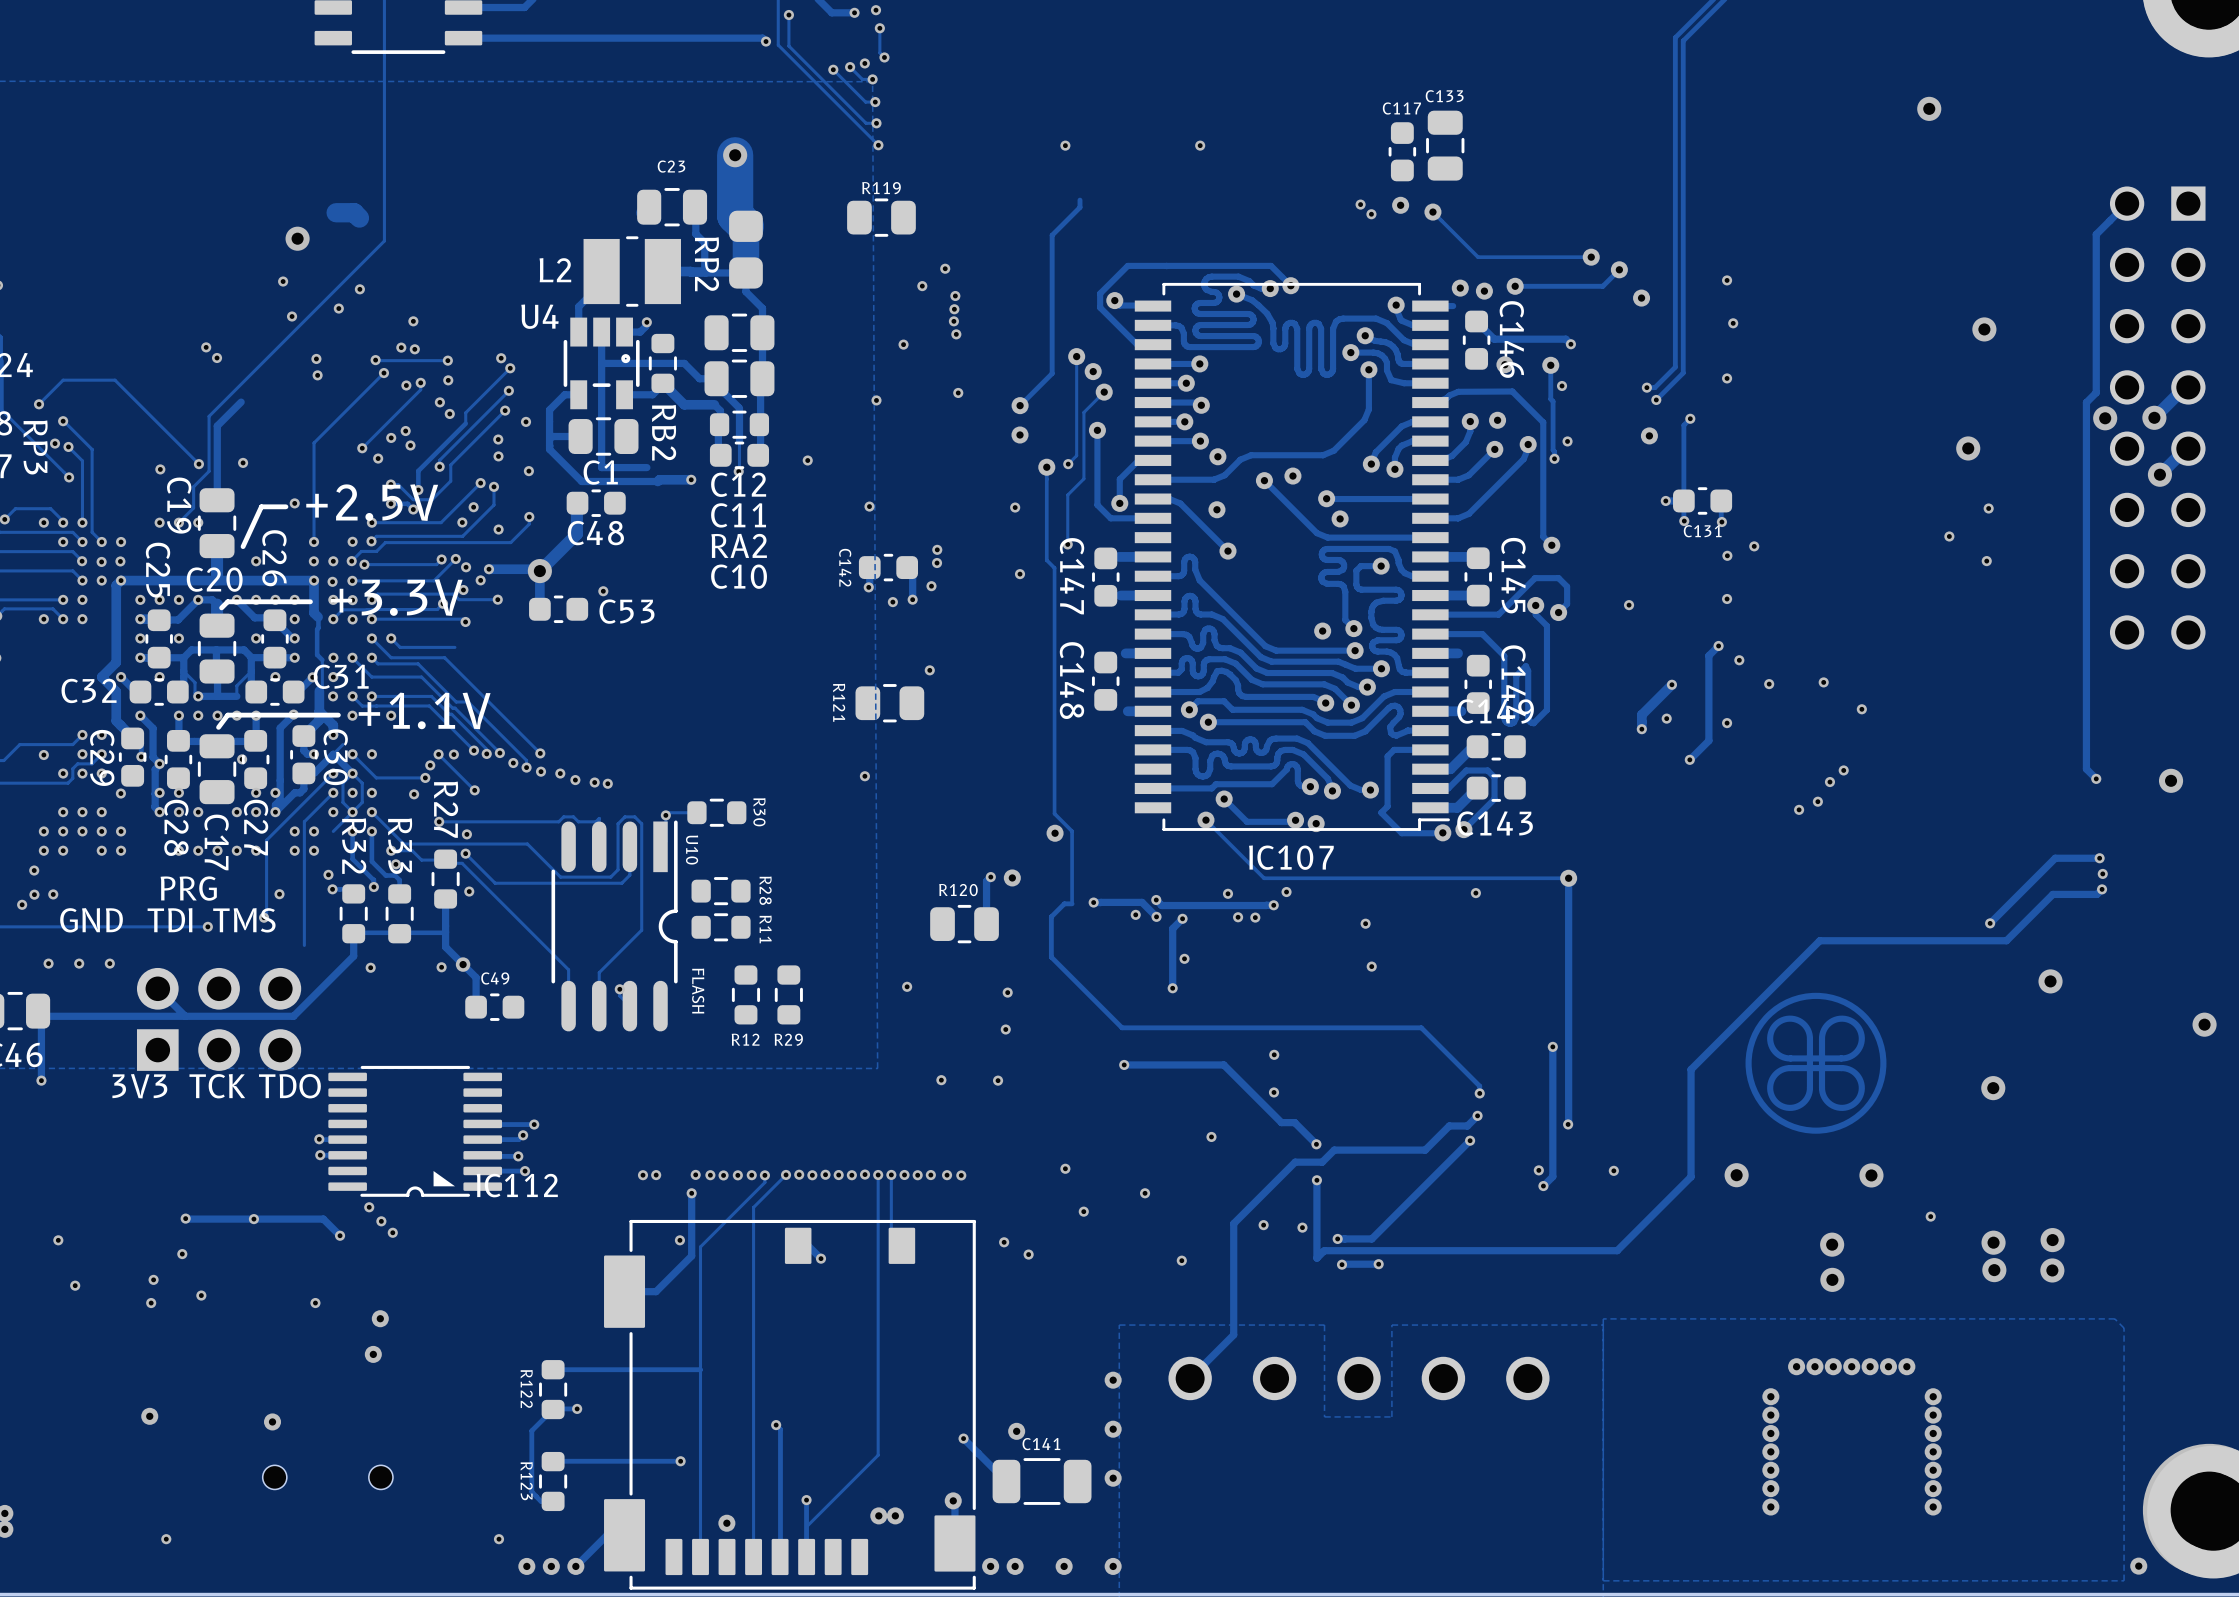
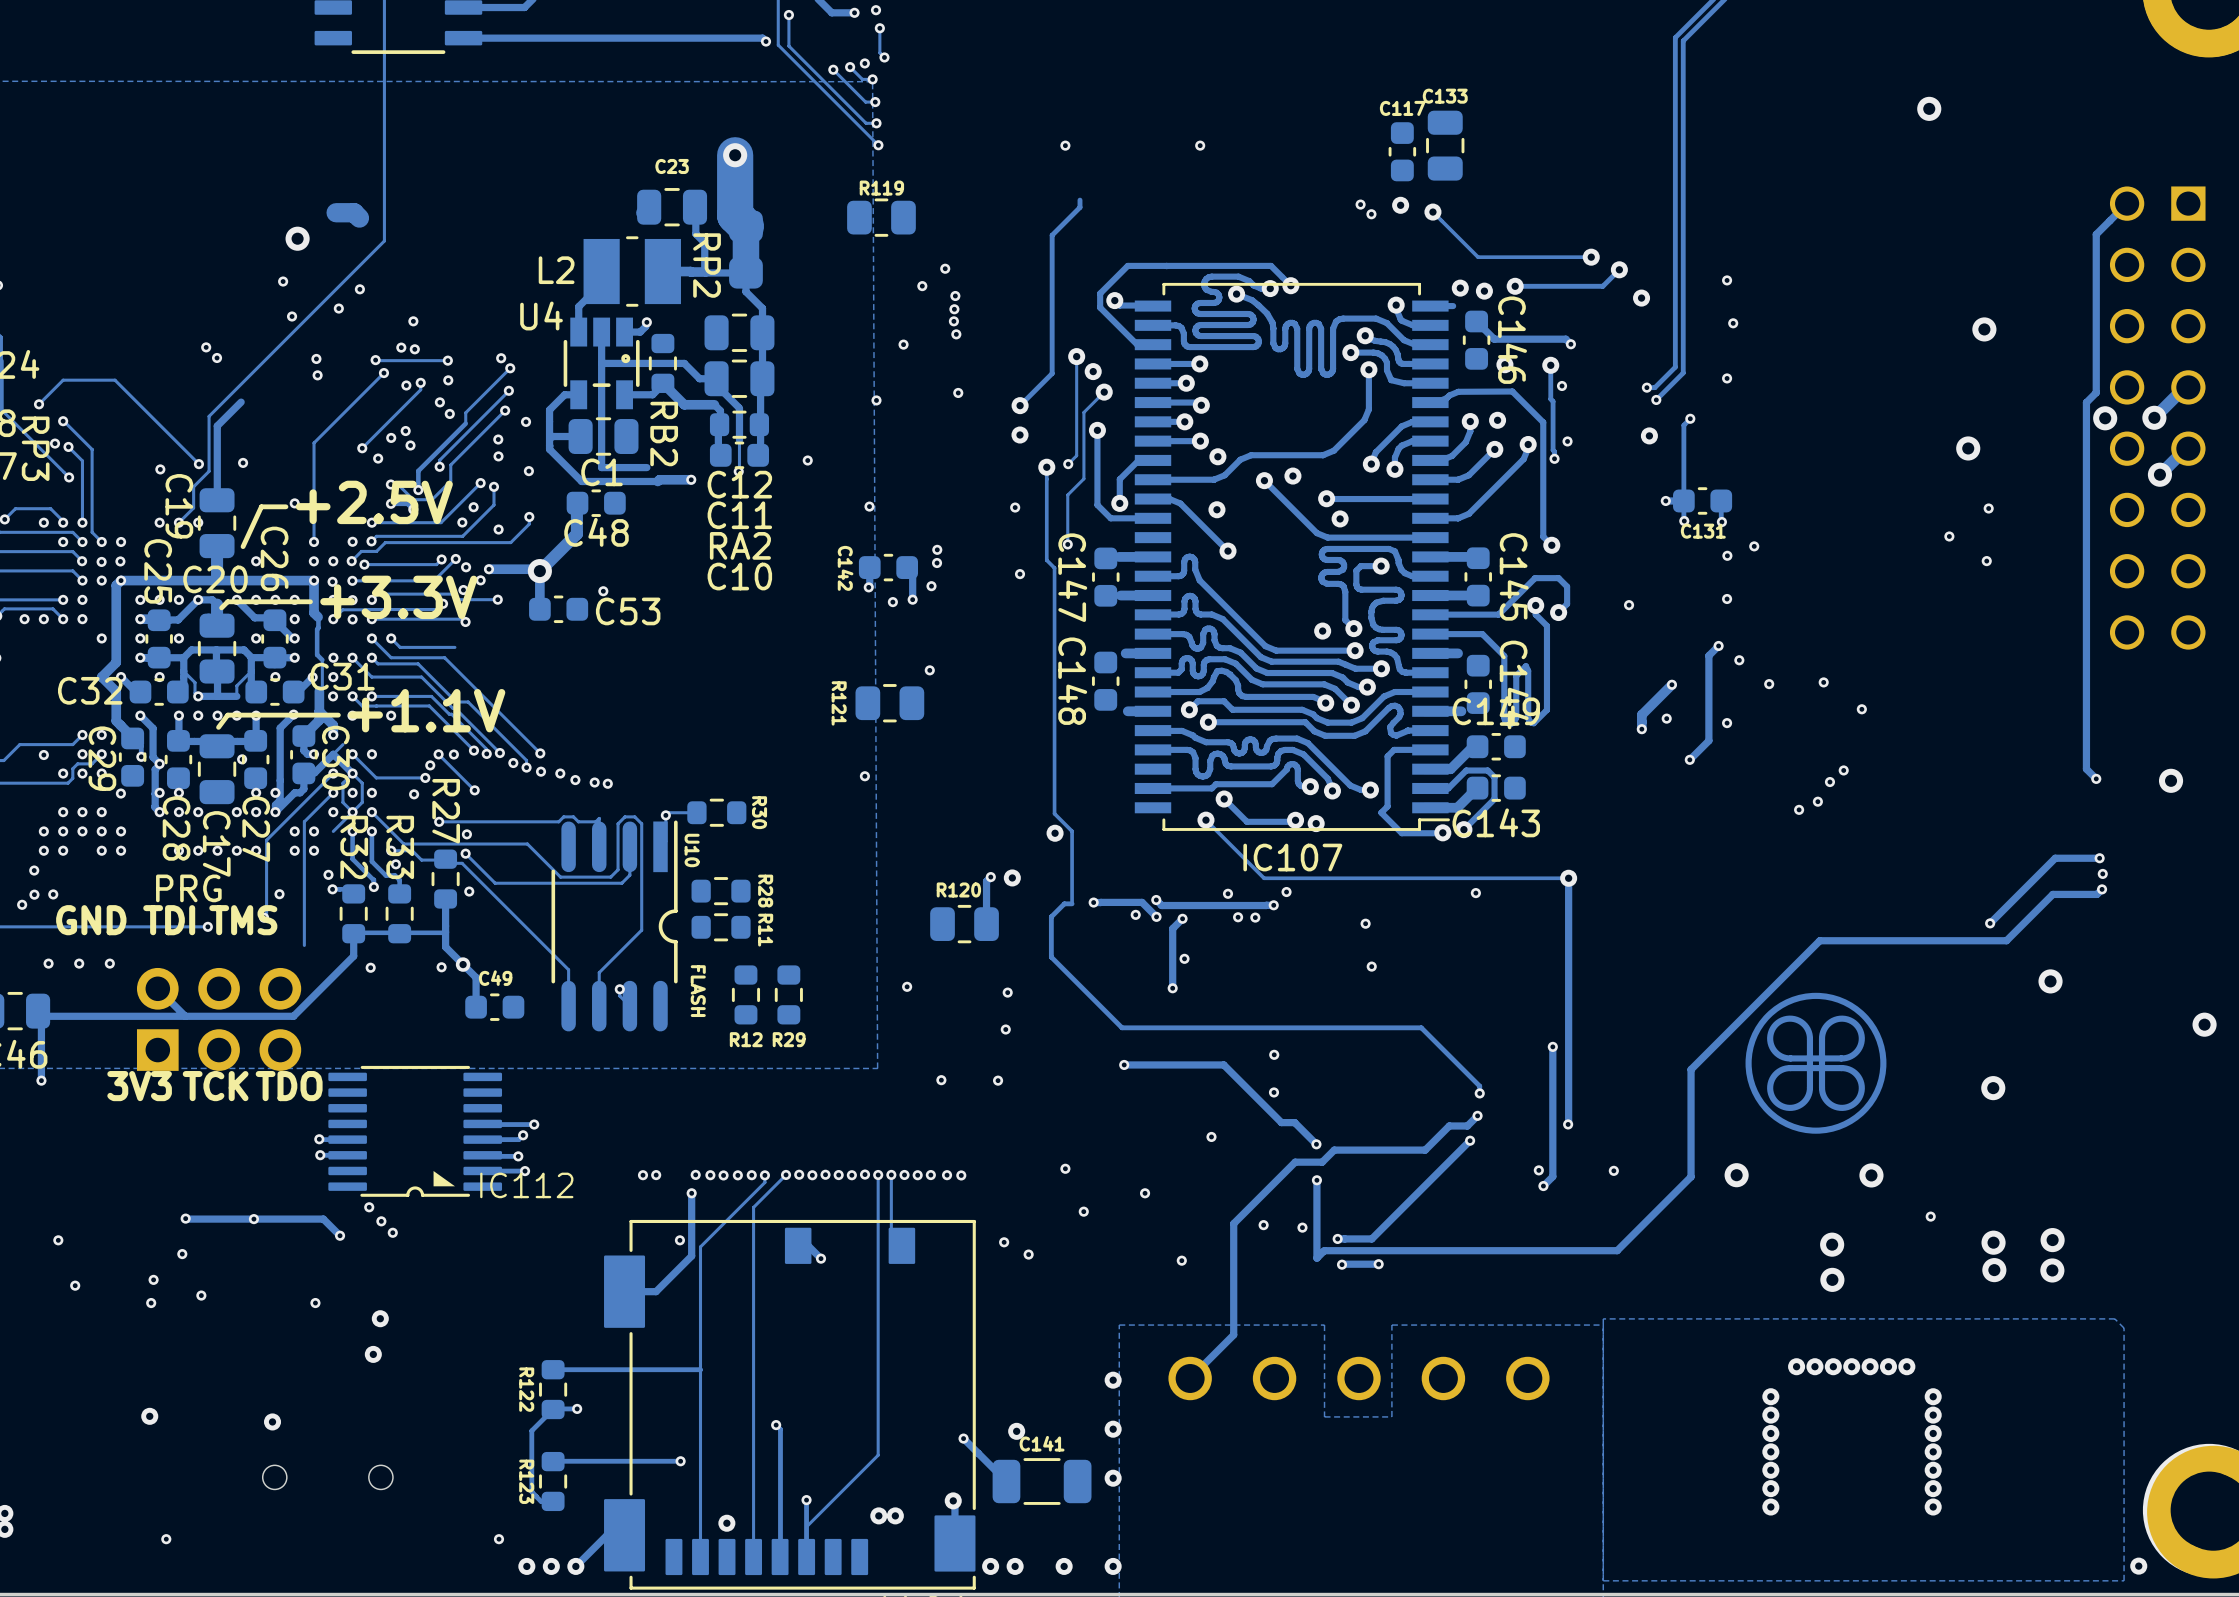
via: none -> (24, 619)
via: none -> (101, 638)

